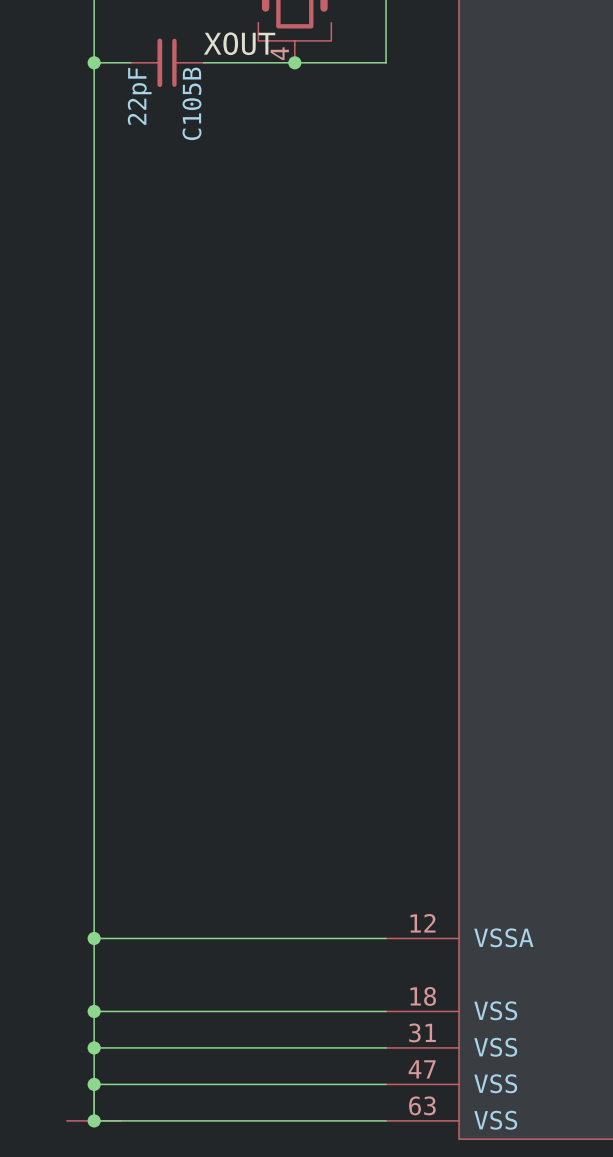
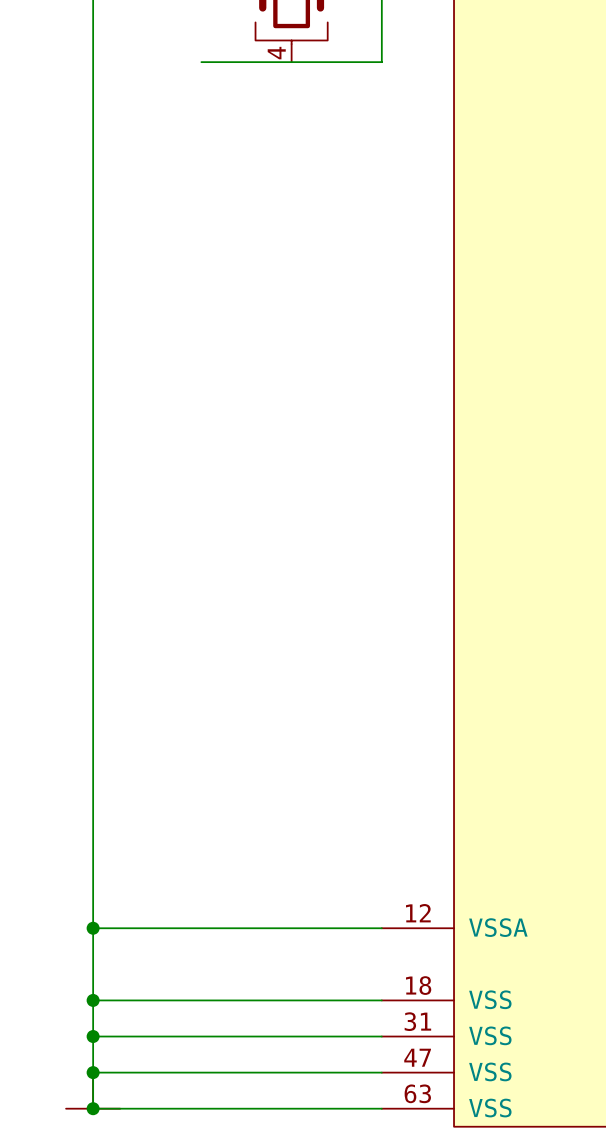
label: XOUT (239, 43) -> none
wire: (94, 62) (130, 62) -> none
junction: (94, 62) -> none
C105B: 22pF (167, 62) -> none
junction: (294, 62) -> none

